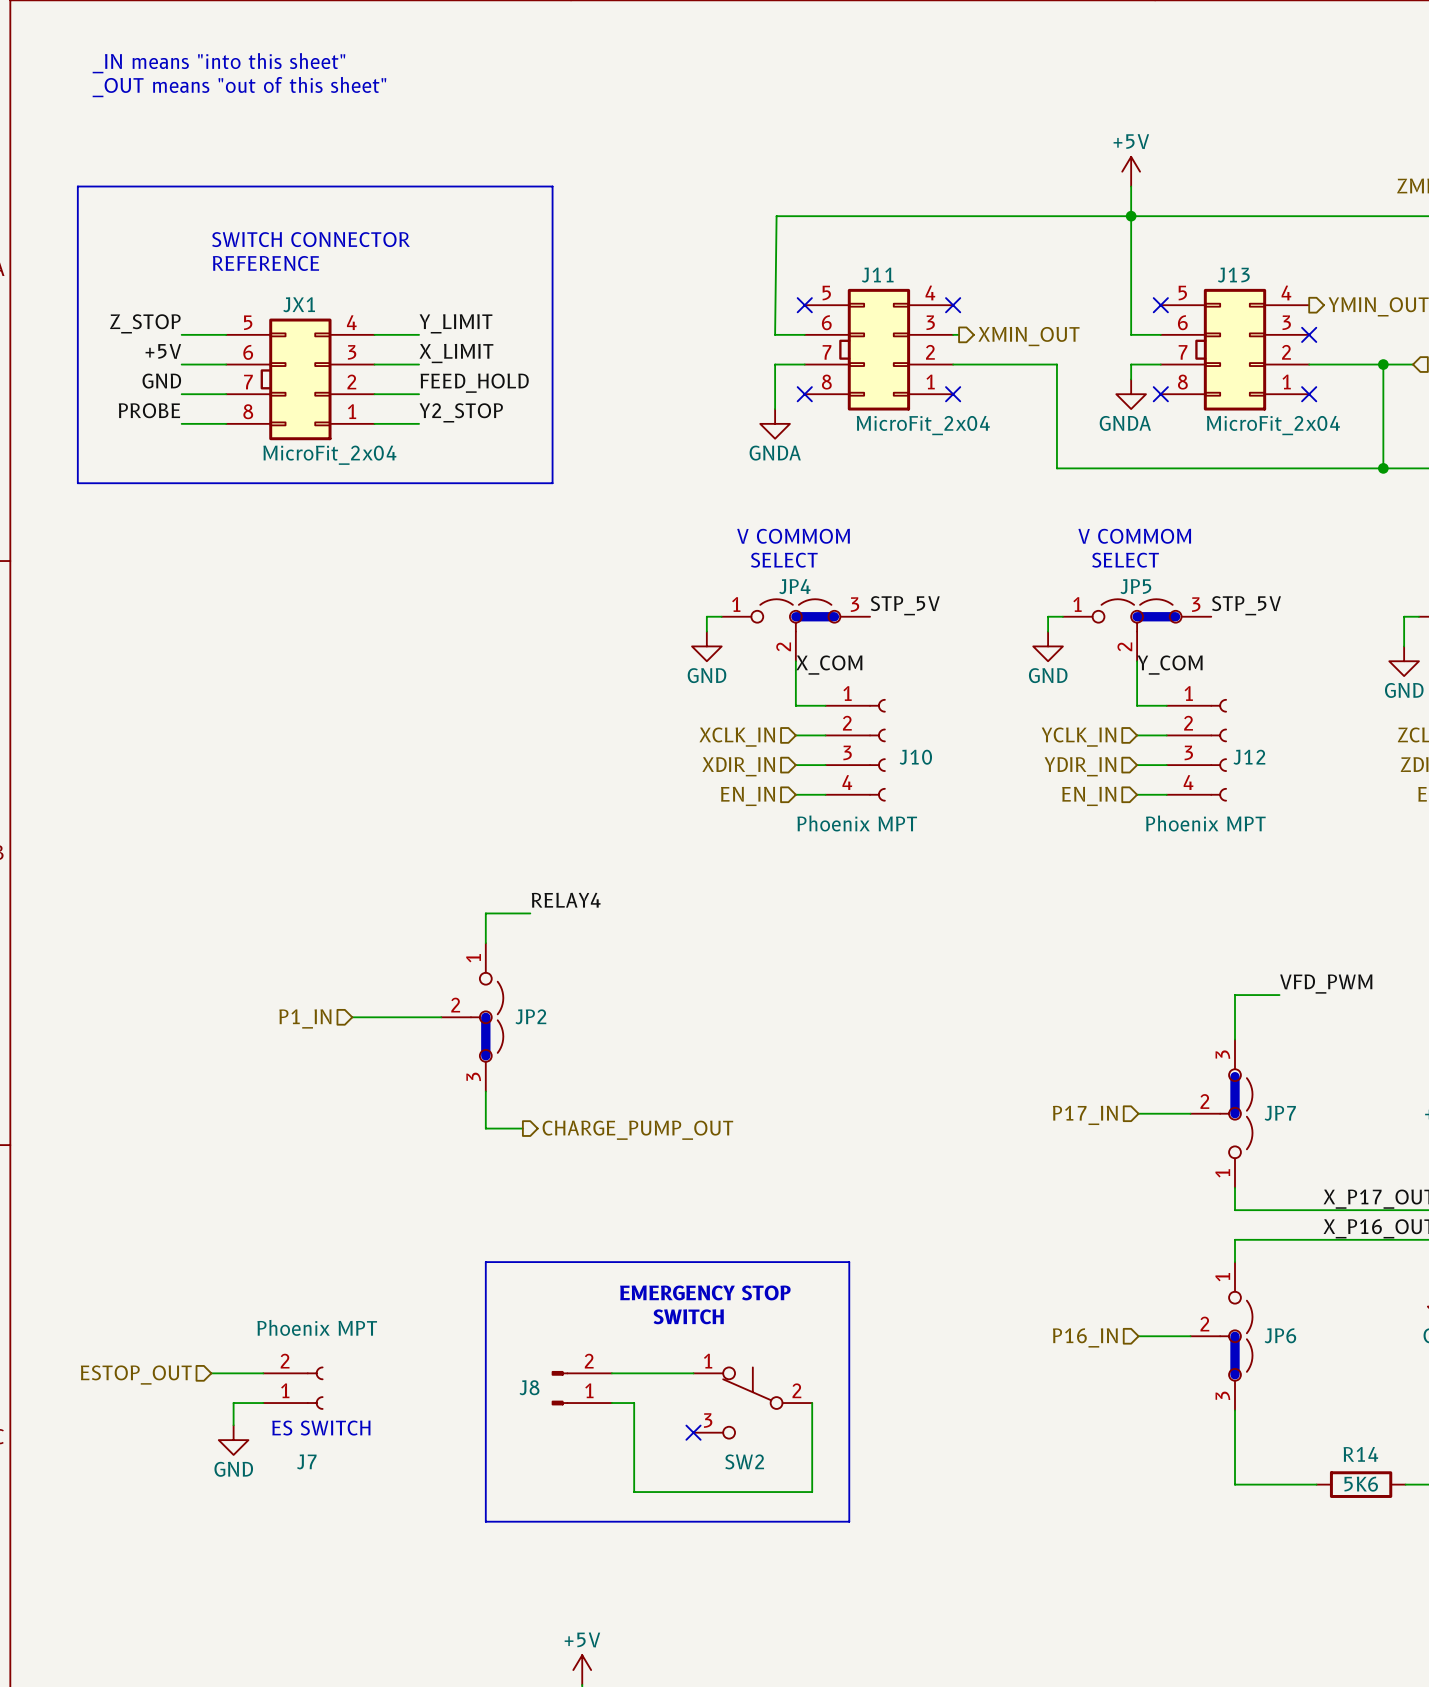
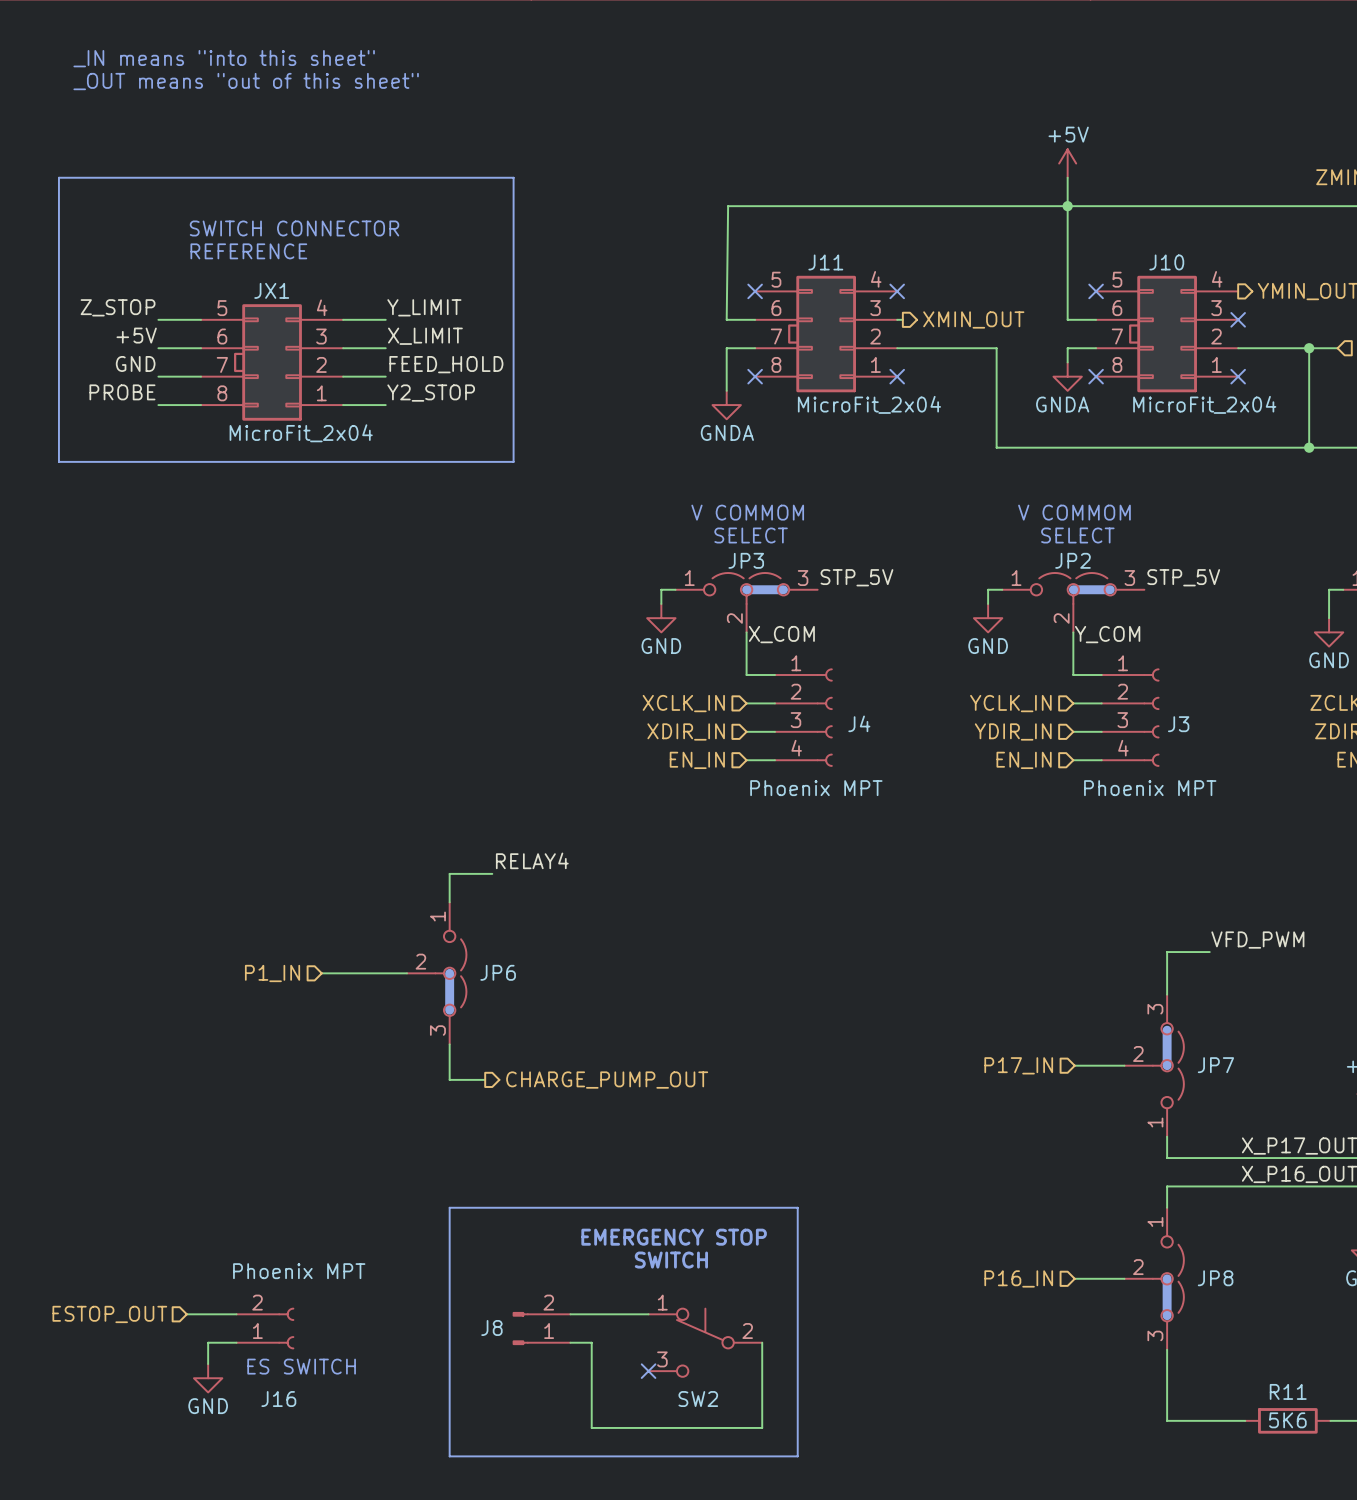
J13 name: J13 (1233, 275) -> J10 (1166, 262)
JP4 name: JP4 (794, 586) -> JP3 (746, 560)
JP5 name: JP5 (1135, 586) -> JP2 (1073, 560)
J10 name: J10 (915, 757) -> J4 (859, 723)
J12 name: J12 (1249, 757) -> J3 (1178, 724)
JP2 name: JP2 (530, 1016) -> JP6 (498, 972)
JP6 name: JP6 (1280, 1335) -> JP8 (1215, 1278)
R14 name: R14 (1360, 1454) -> R11 (1288, 1391)
J7 name: J7 (306, 1461) -> J16 (278, 1399)

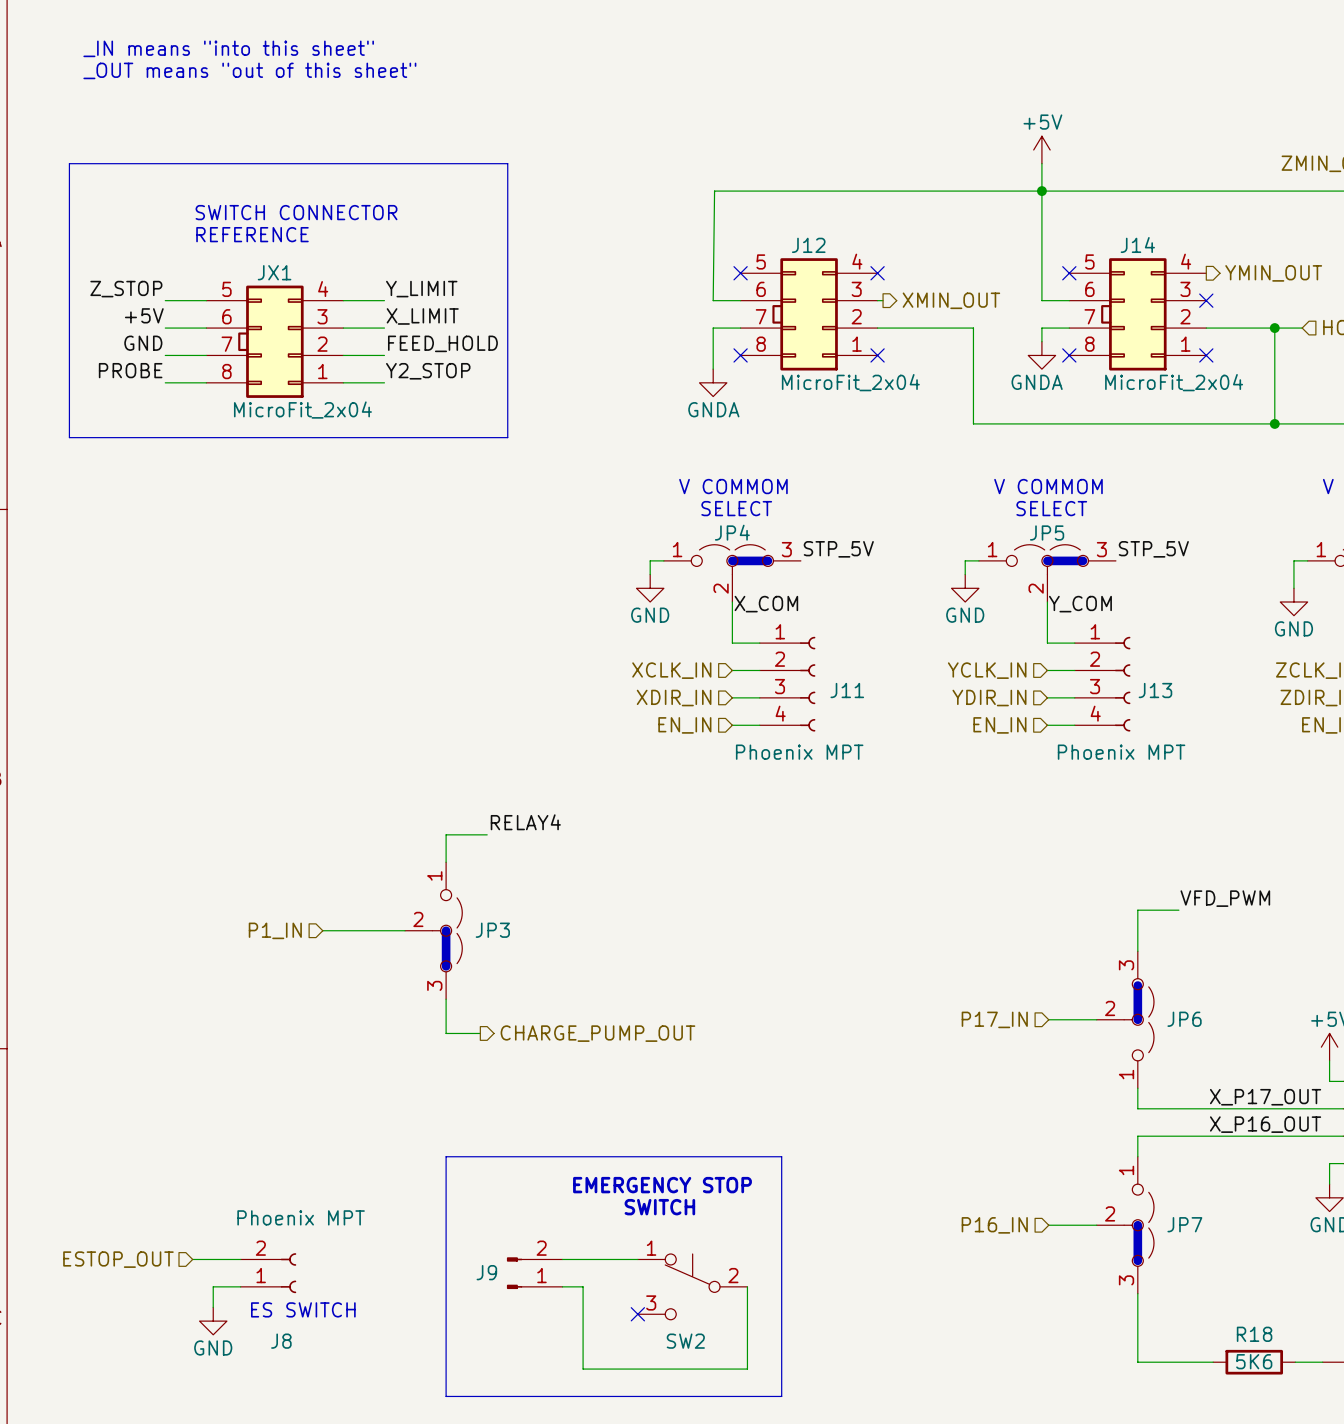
J11 name: J11 (825, 262) -> J12 (808, 245)
J10 name: J10 (1166, 262) -> J14 (1137, 245)
JP3 name: JP3 (746, 560) -> JP4 (732, 532)
JP2 name: JP2 (1073, 560) -> JP5 (1047, 533)
J4 name: J4 (859, 723) -> J11 (847, 690)
J3 name: J3 (1178, 724) -> J13 (1155, 690)
JP6 name: JP6 (498, 972) -> JP3 (492, 930)
JP7 name: JP7 (1215, 1065) -> JP6 (1184, 1019)
JP8 name: JP8 (1215, 1278) -> JP7 (1184, 1224)
J8 name: J8 (491, 1327) -> J9 (486, 1272)
R11 name: R11 (1288, 1391) -> R18 (1254, 1334)
J16 name: J16 (278, 1399) -> J8 (281, 1341)

